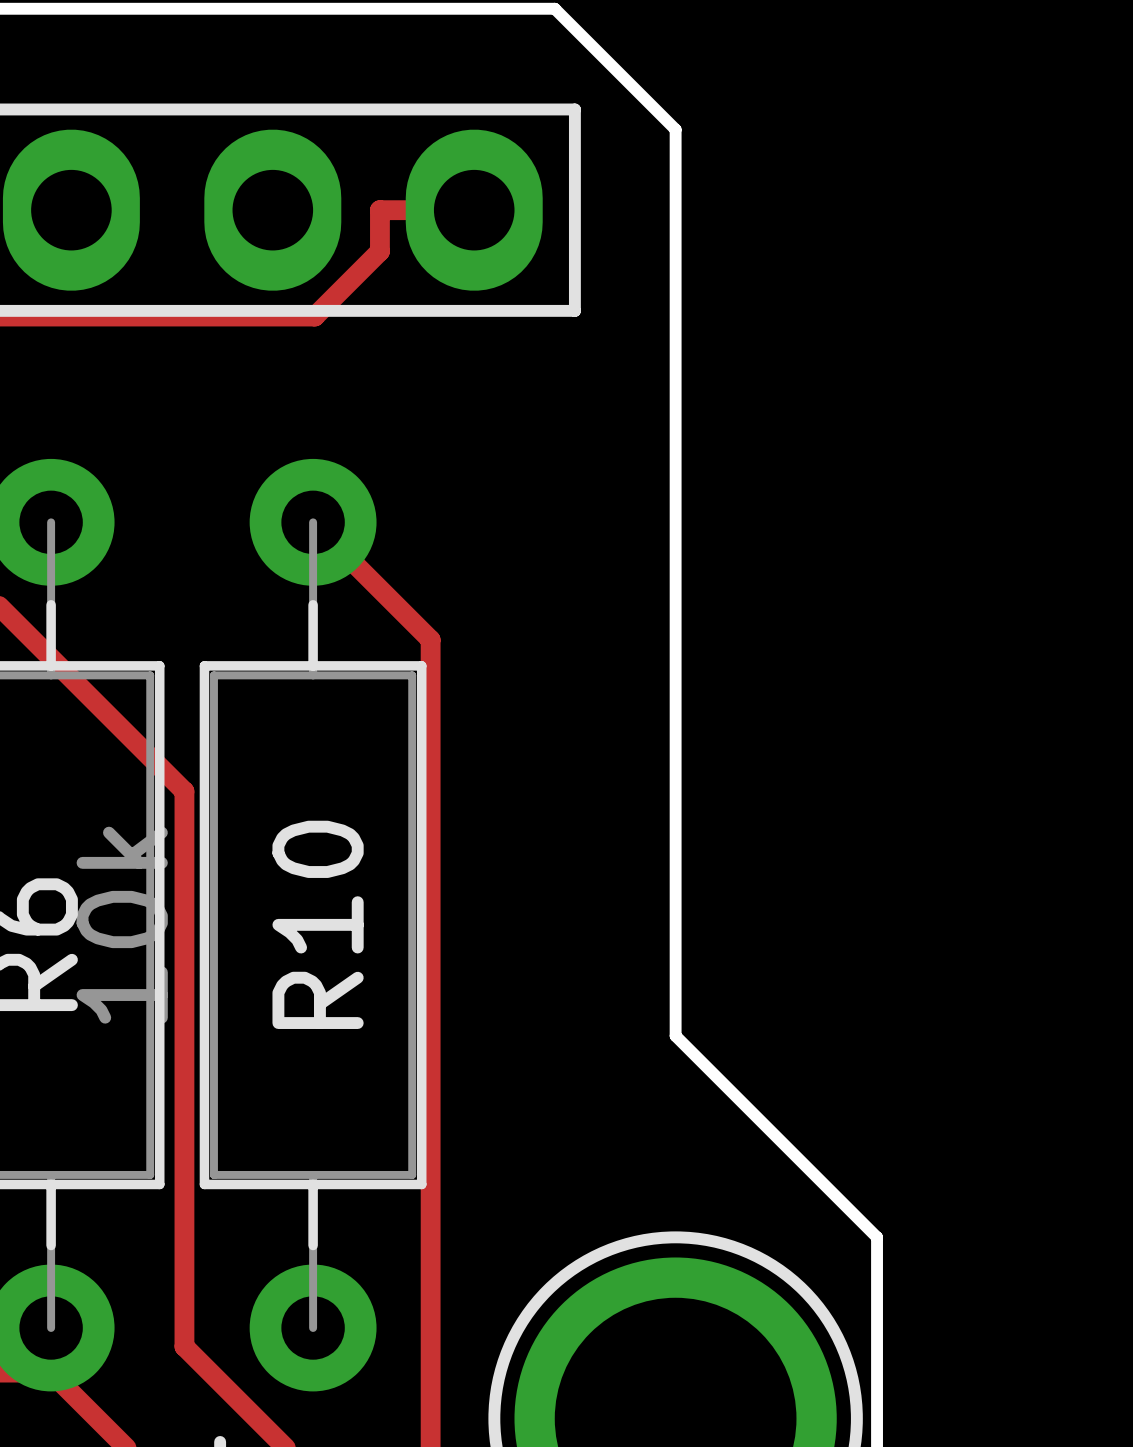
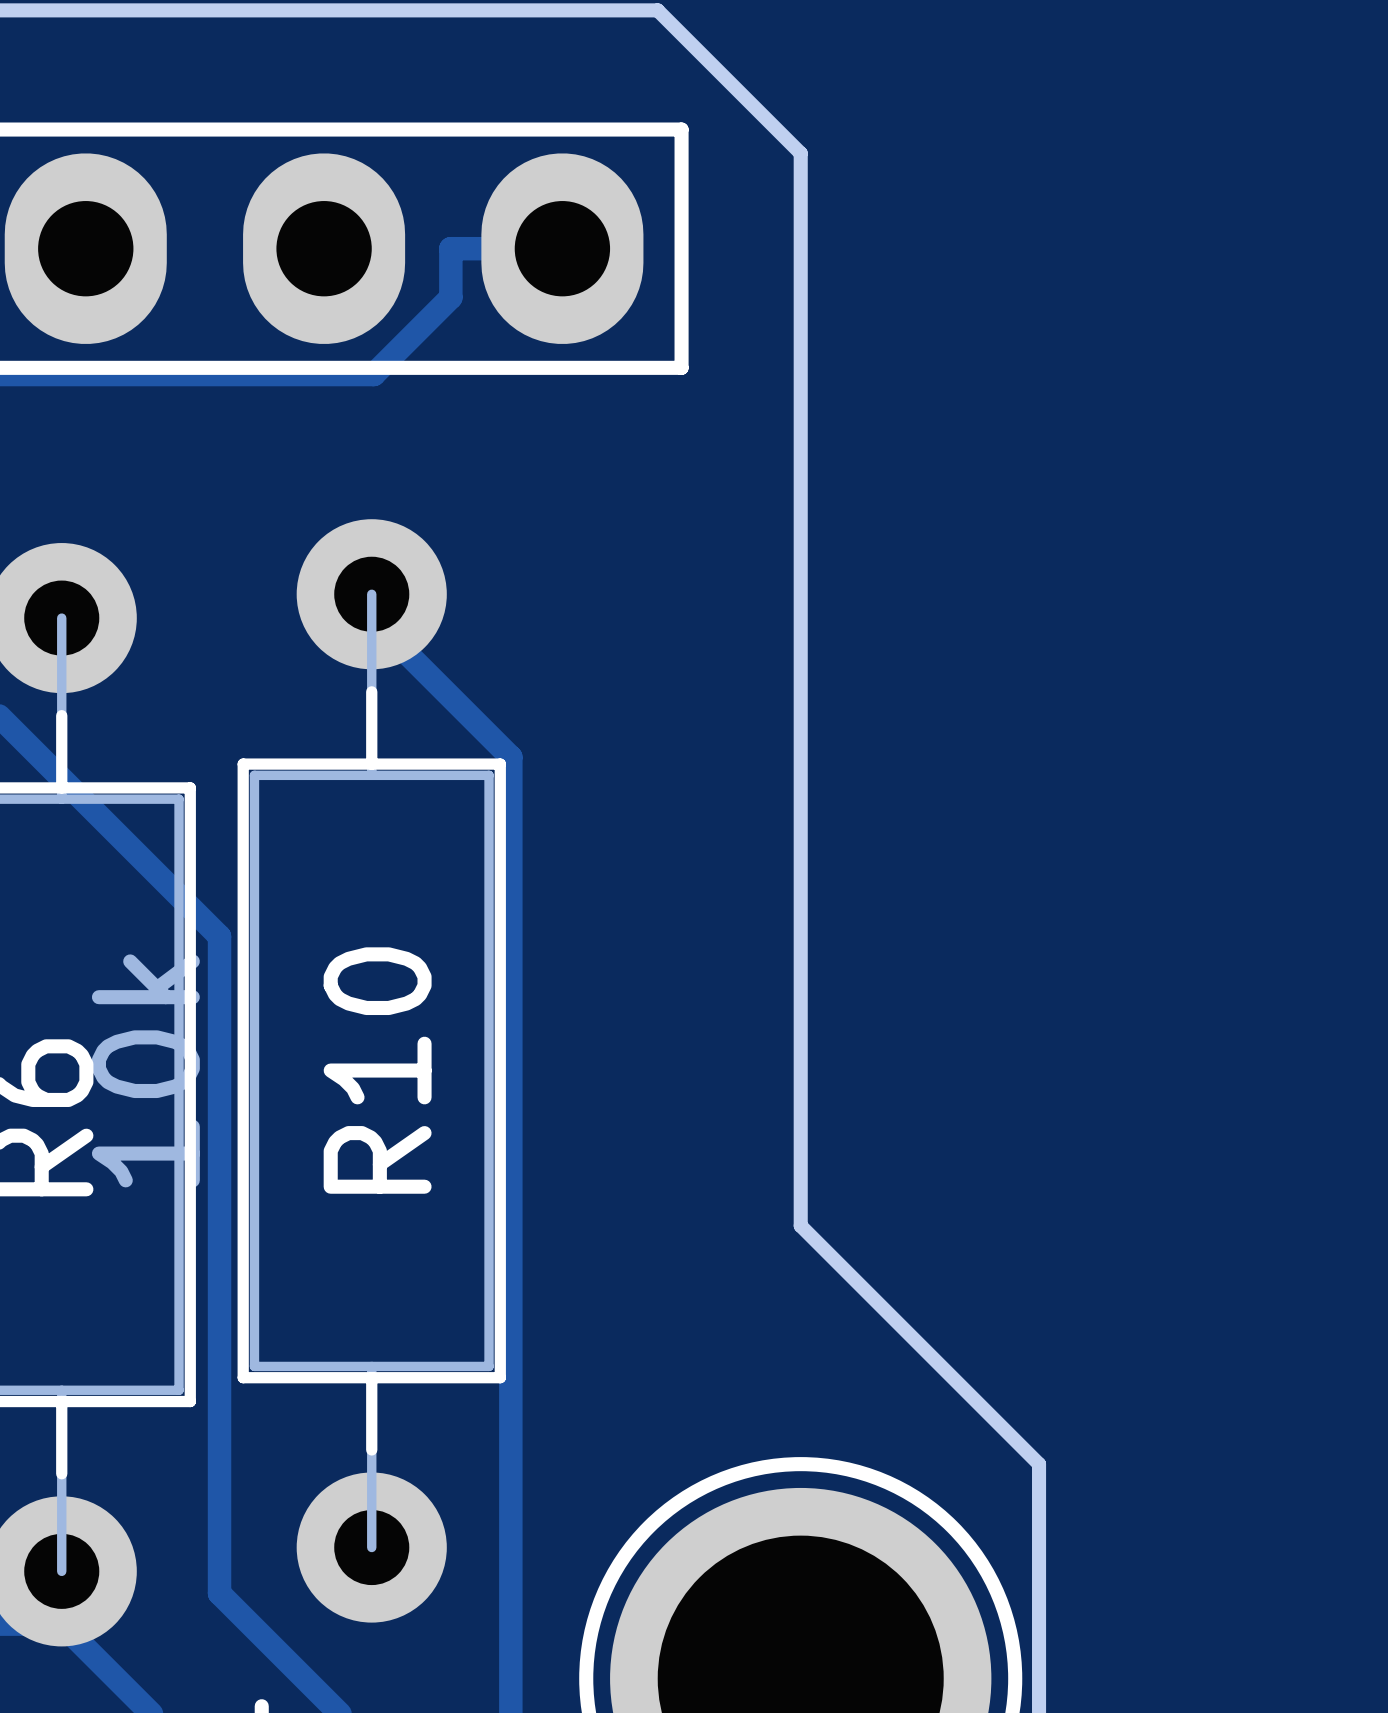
R10 position: (313, 925) -> (371, 1070)

